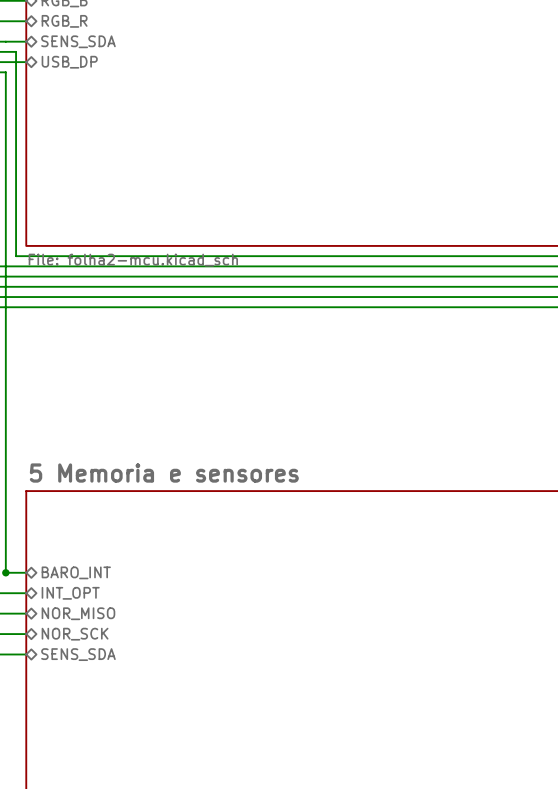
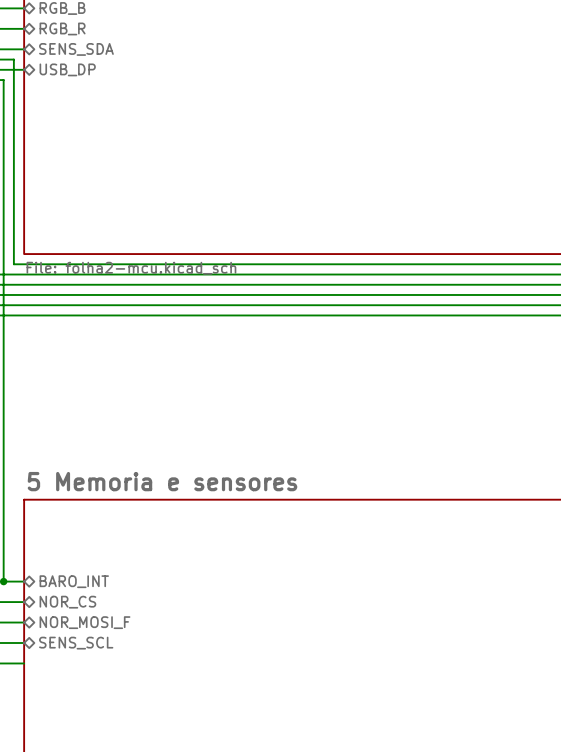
sheet pin: INT_OPT (70, 593) -> NOR_CS (67, 602)
sheet pin: NOR_MISO (78, 613) -> NOR_MOSI_F (84, 622)
sheet pin: NOR_SCK (75, 634) -> SENS_SCL (76, 643)
sheet pin: SENS_SDA (78, 654) -> none

